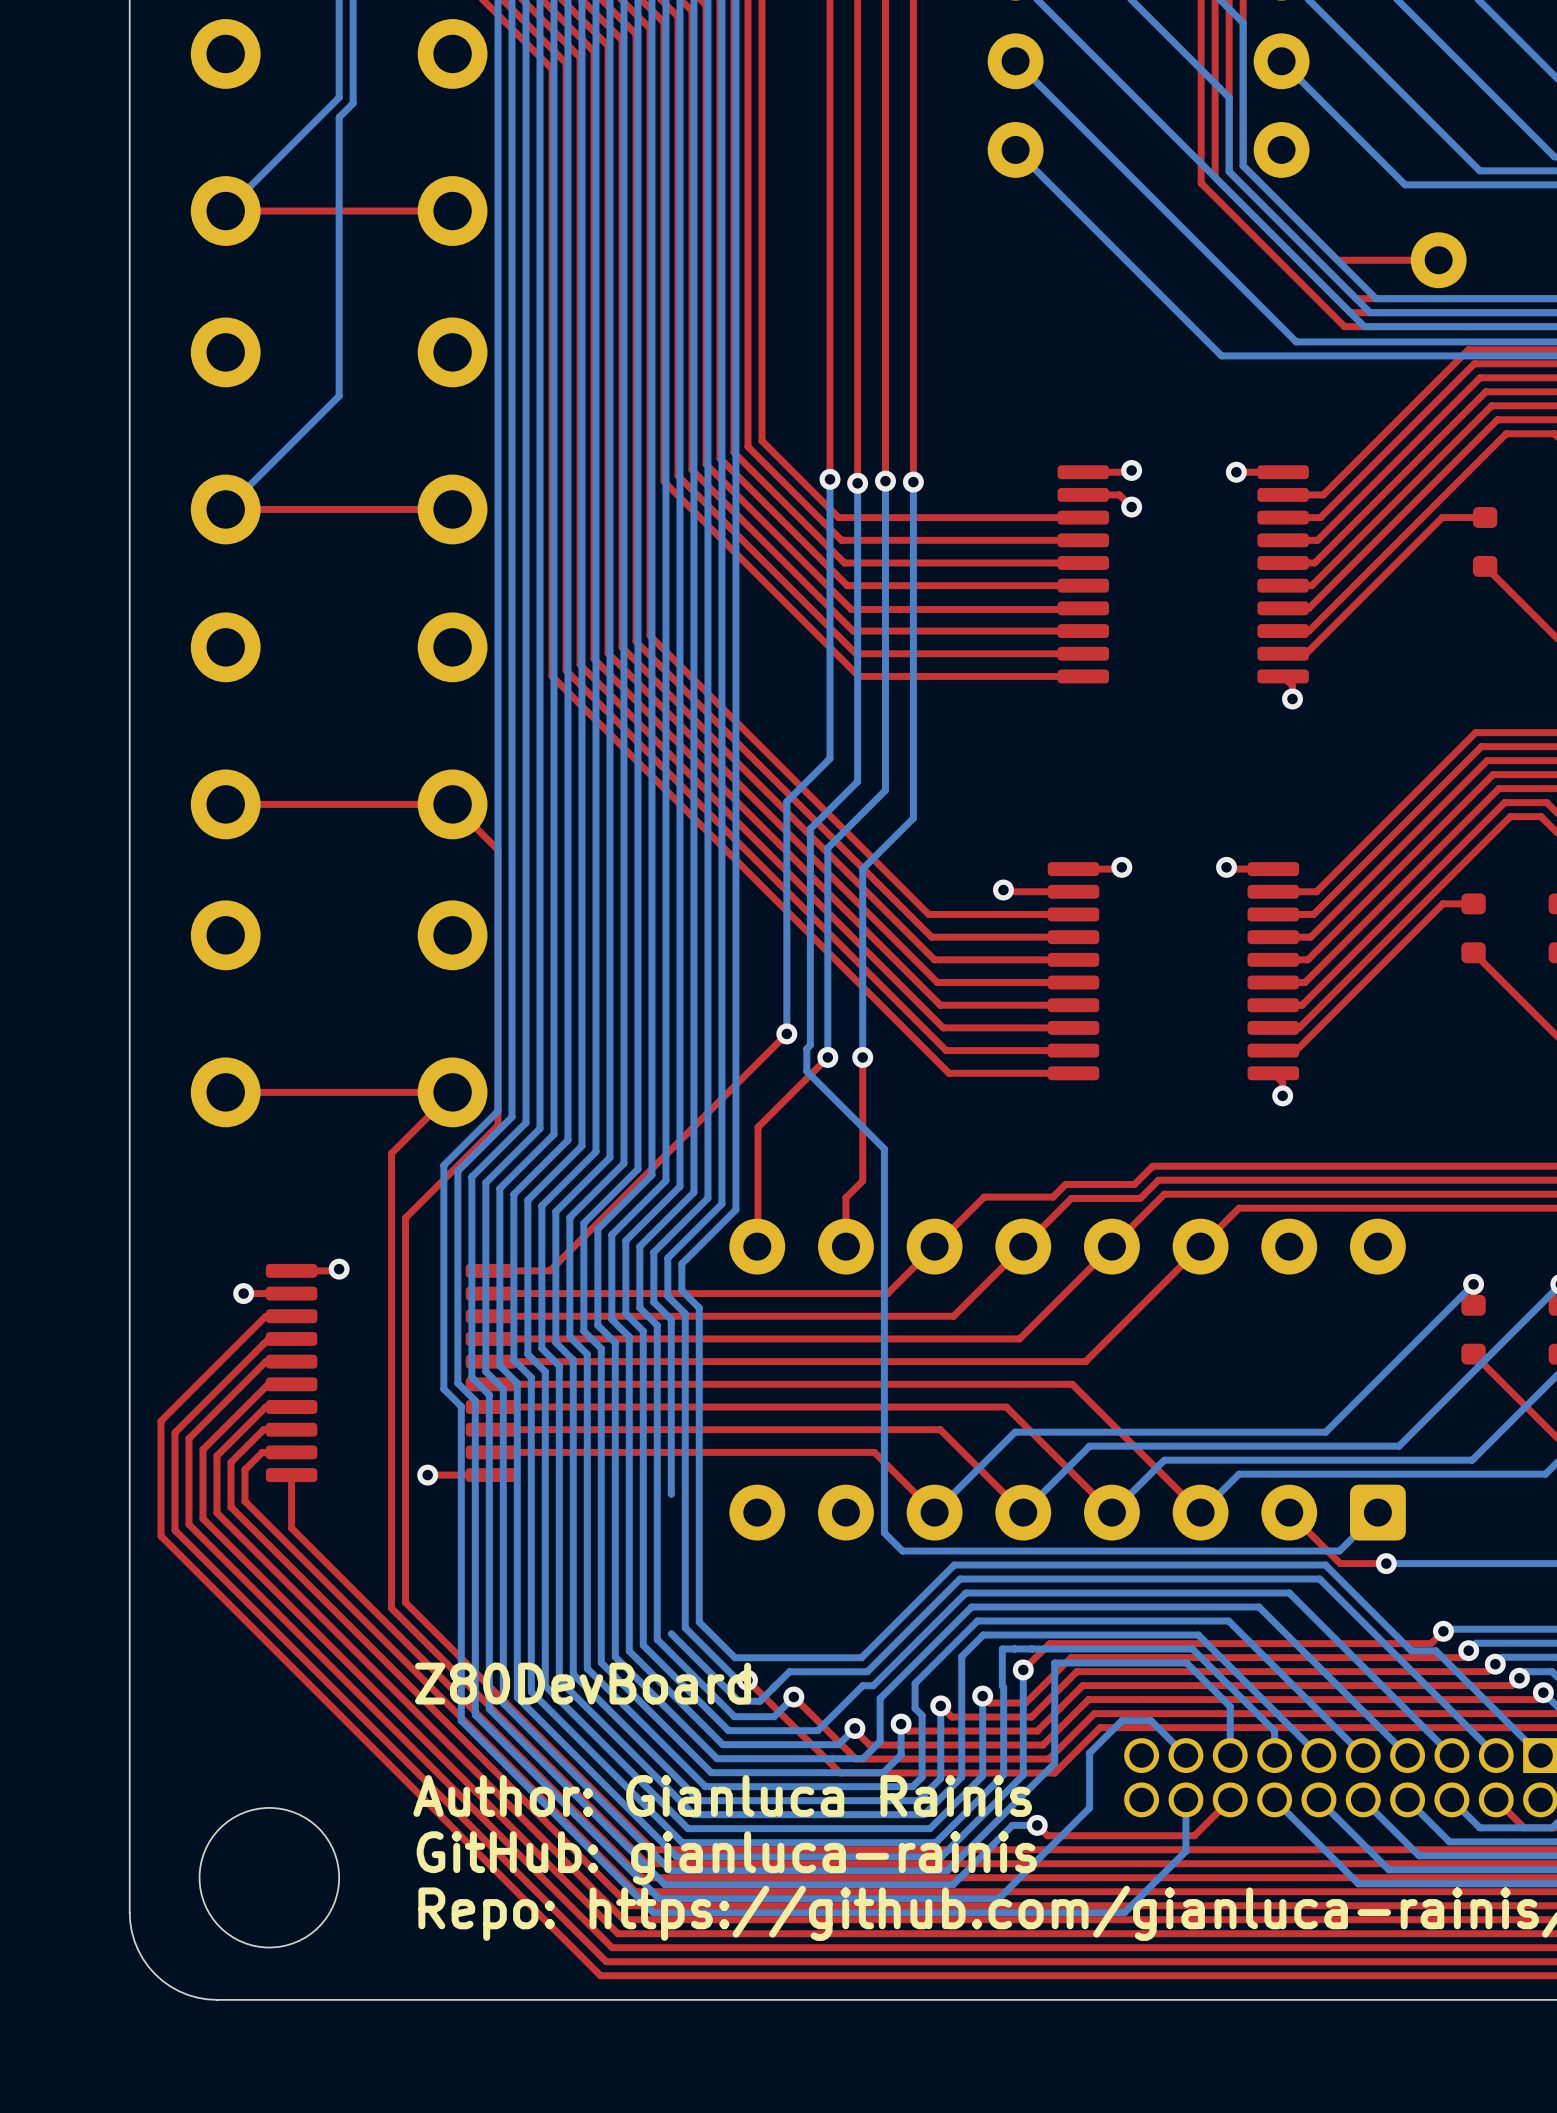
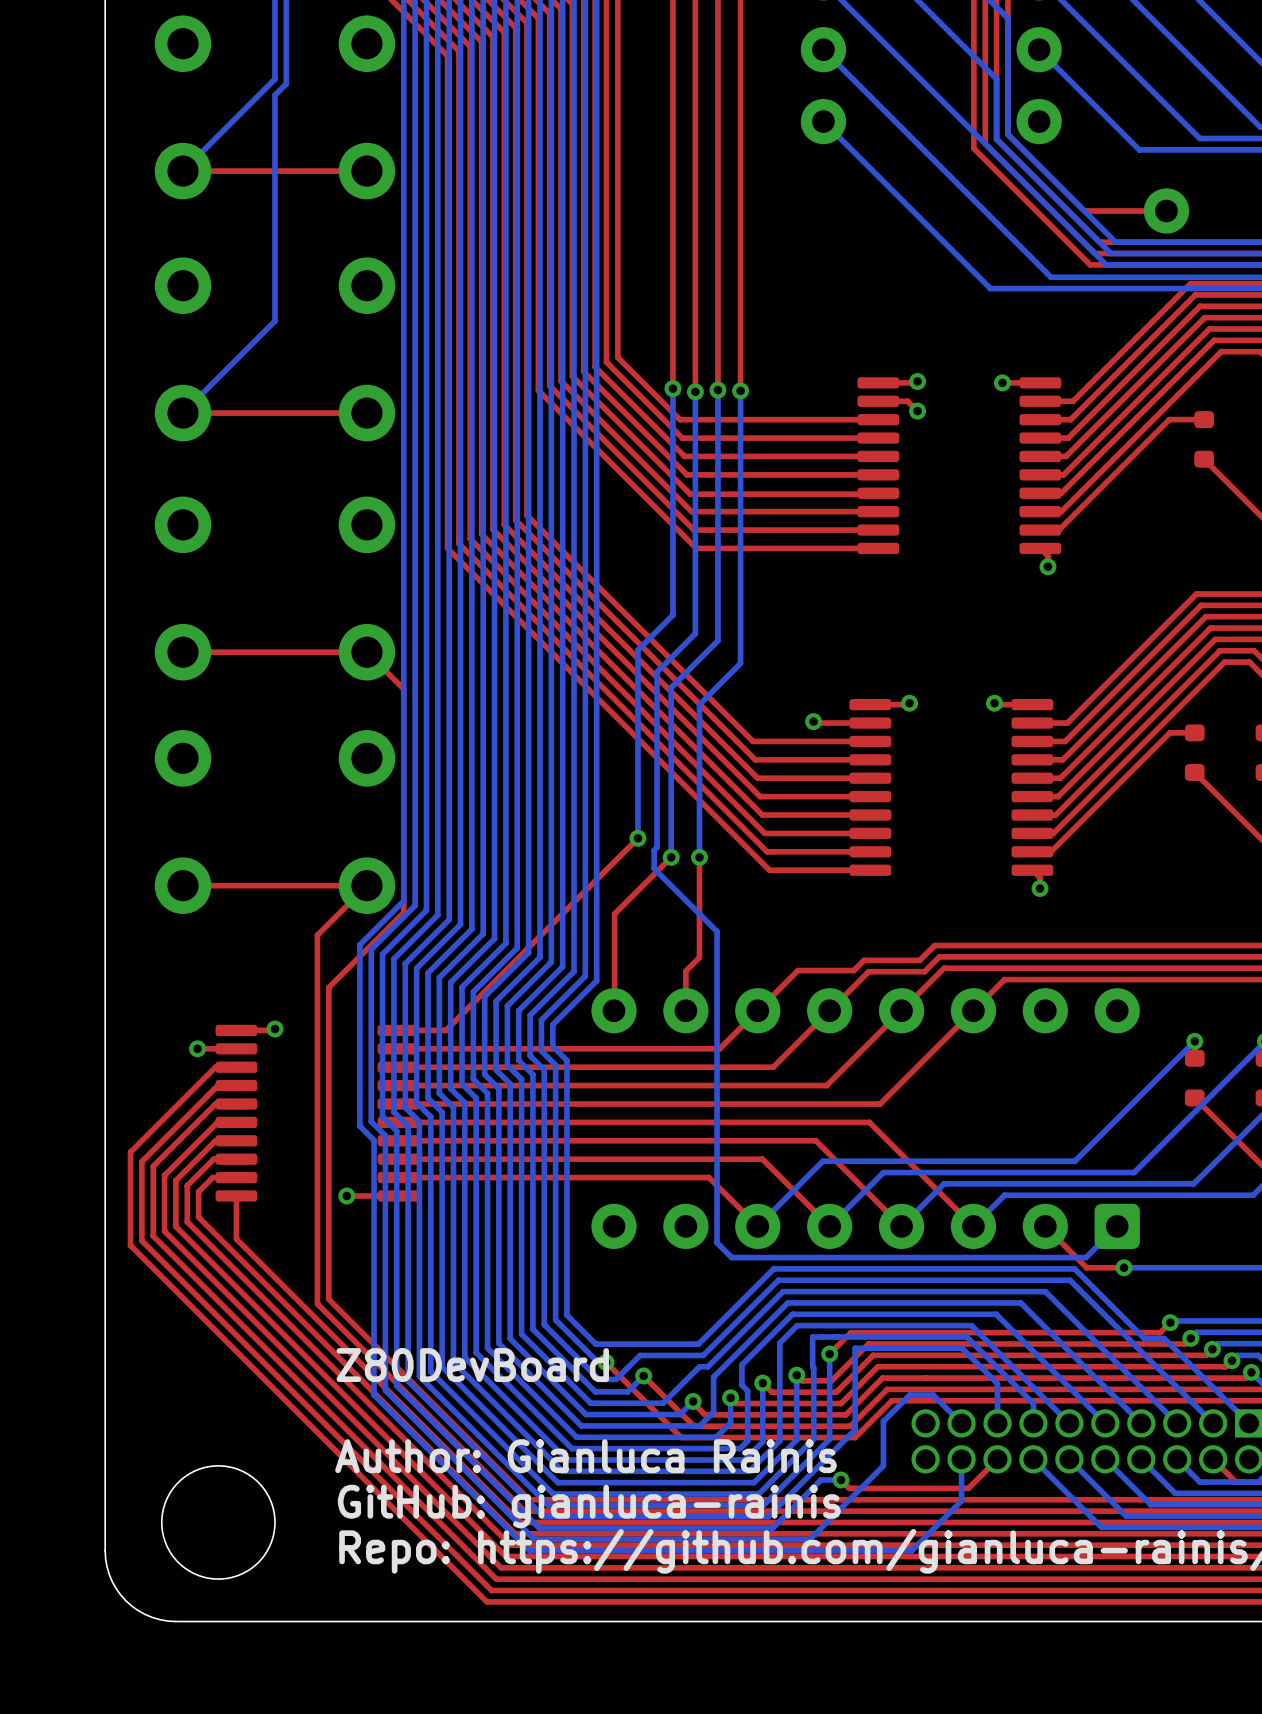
bottom track: none -> (544, 1211) (544, 1324)

